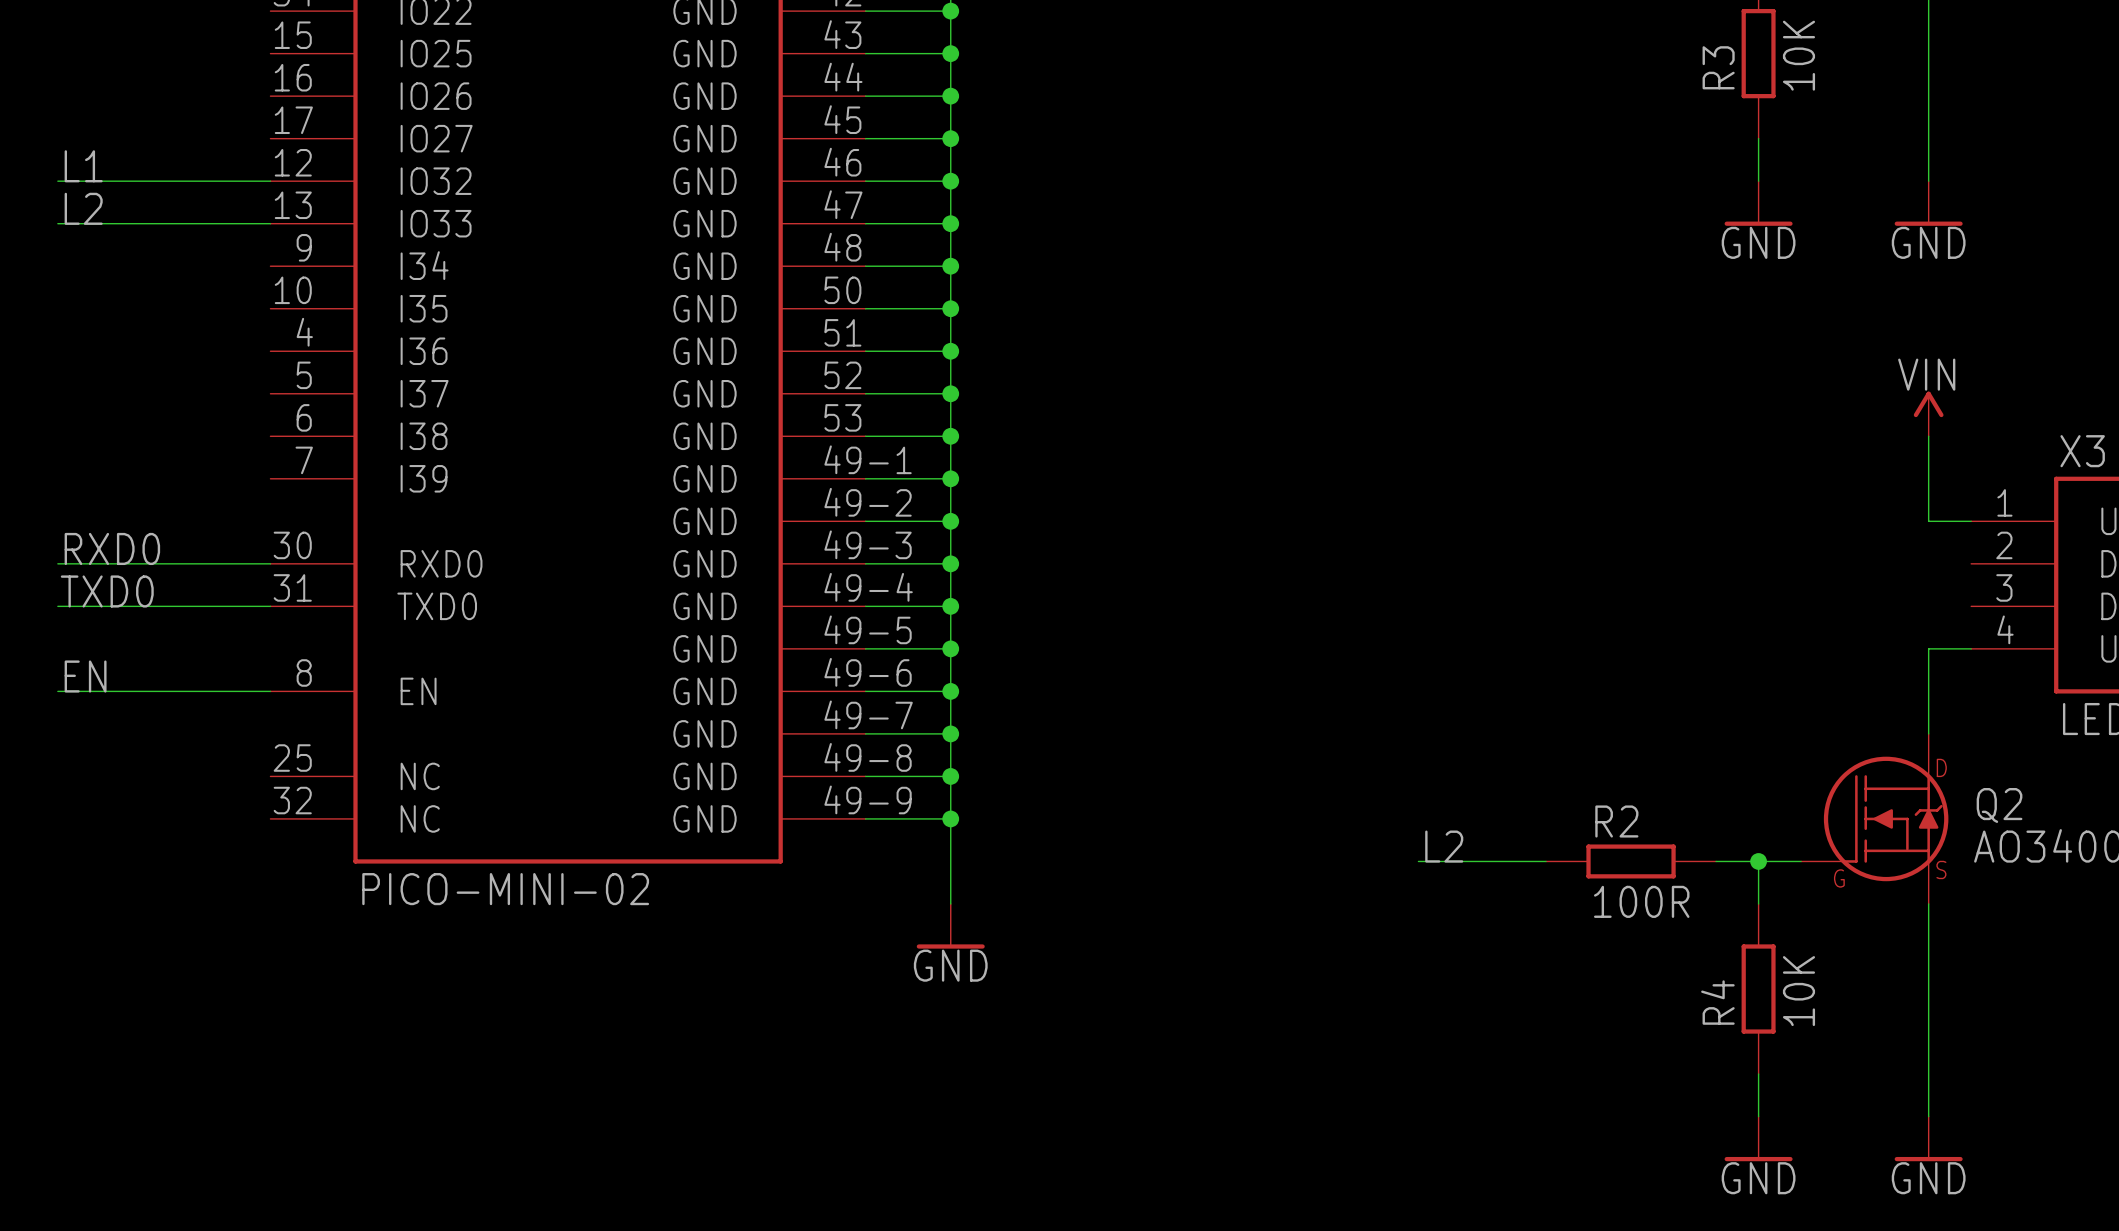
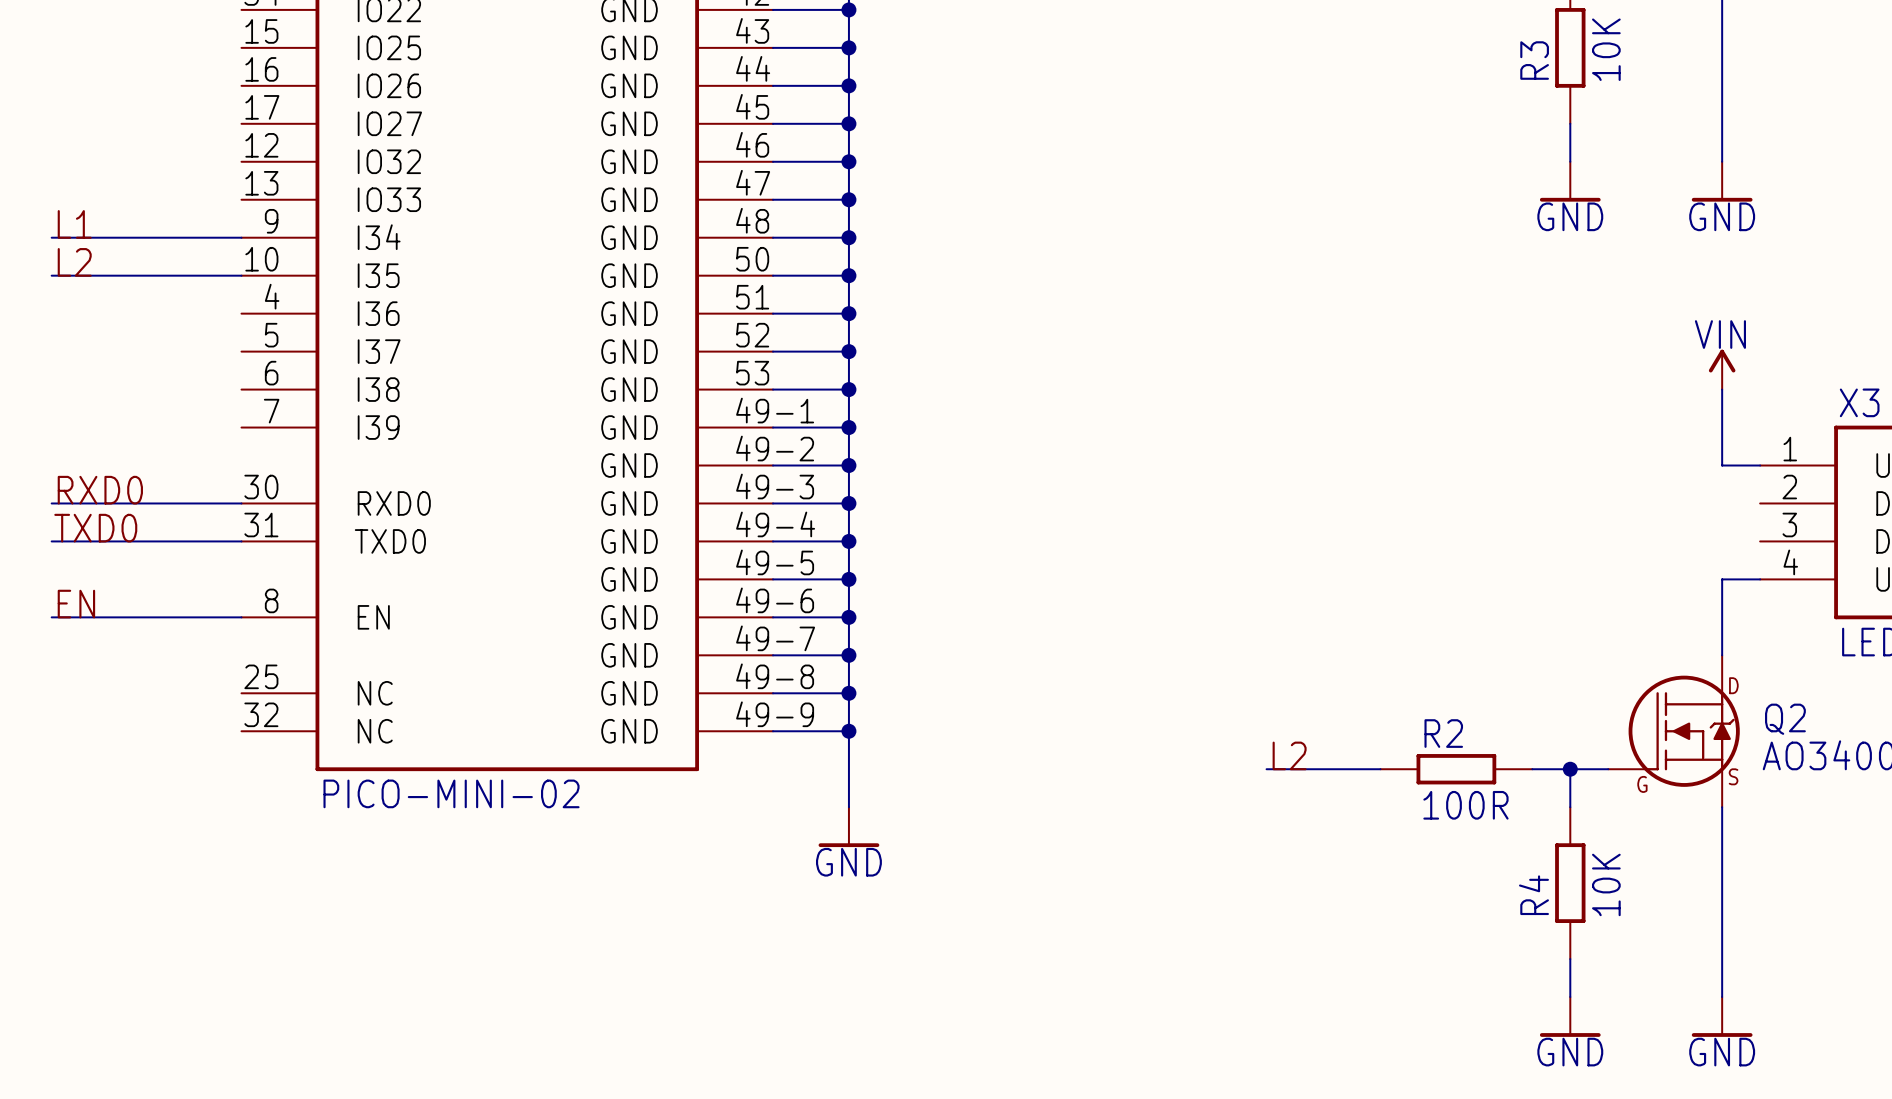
label position: L1 (83, 166) -> L1 (74, 224)
wire: (57, 181) (270, 181) -> (51, 275) (241, 275)
label position: L2 (83, 208) -> L2 (74, 262)
wire: (57, 223) (270, 223) -> (51, 237) (241, 237)

